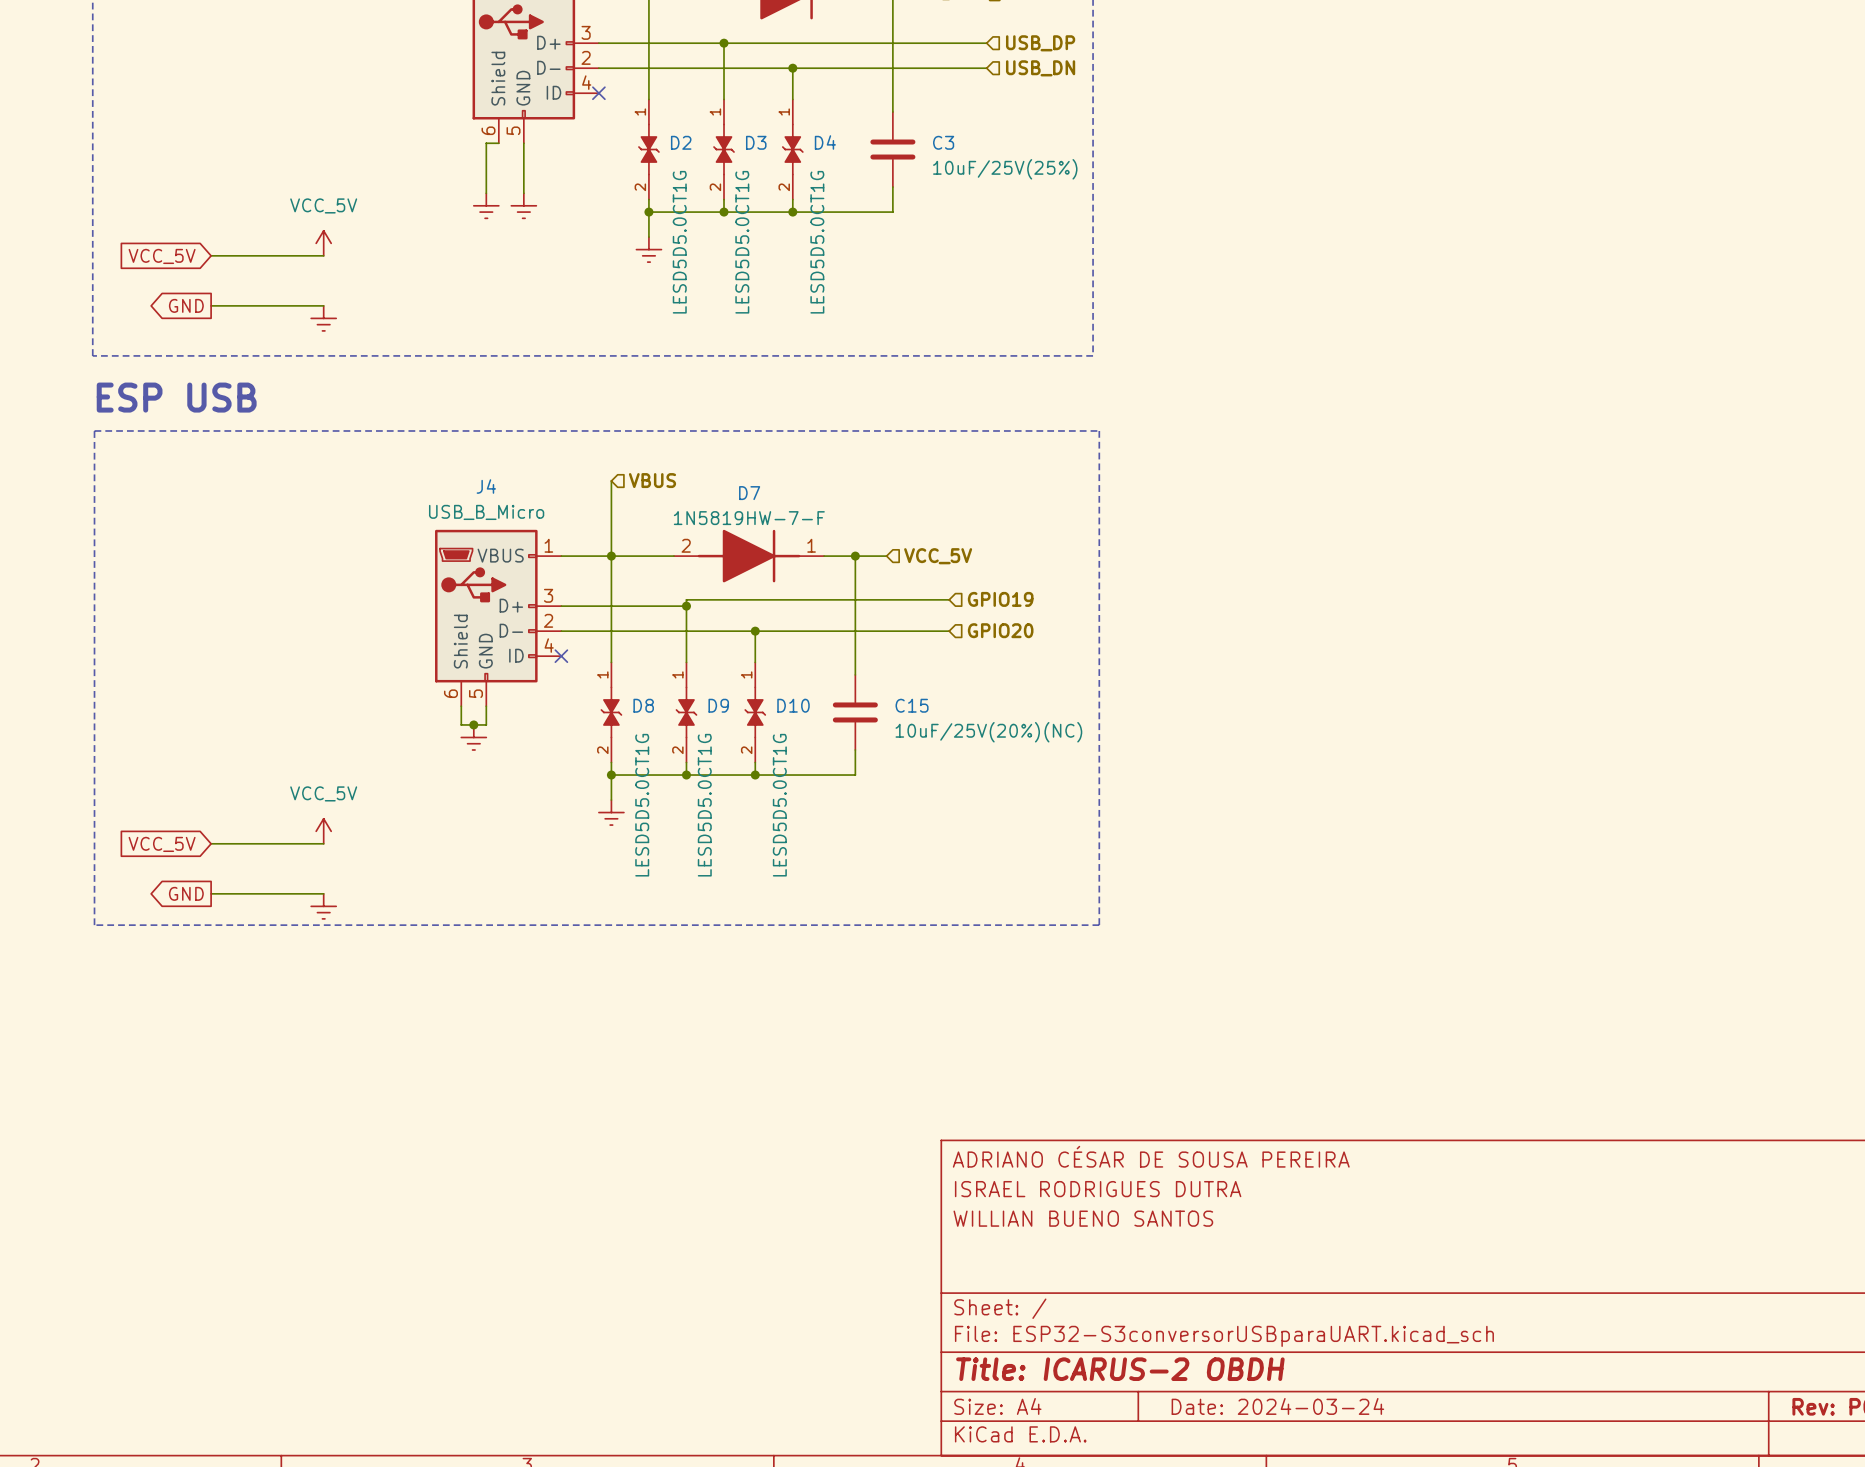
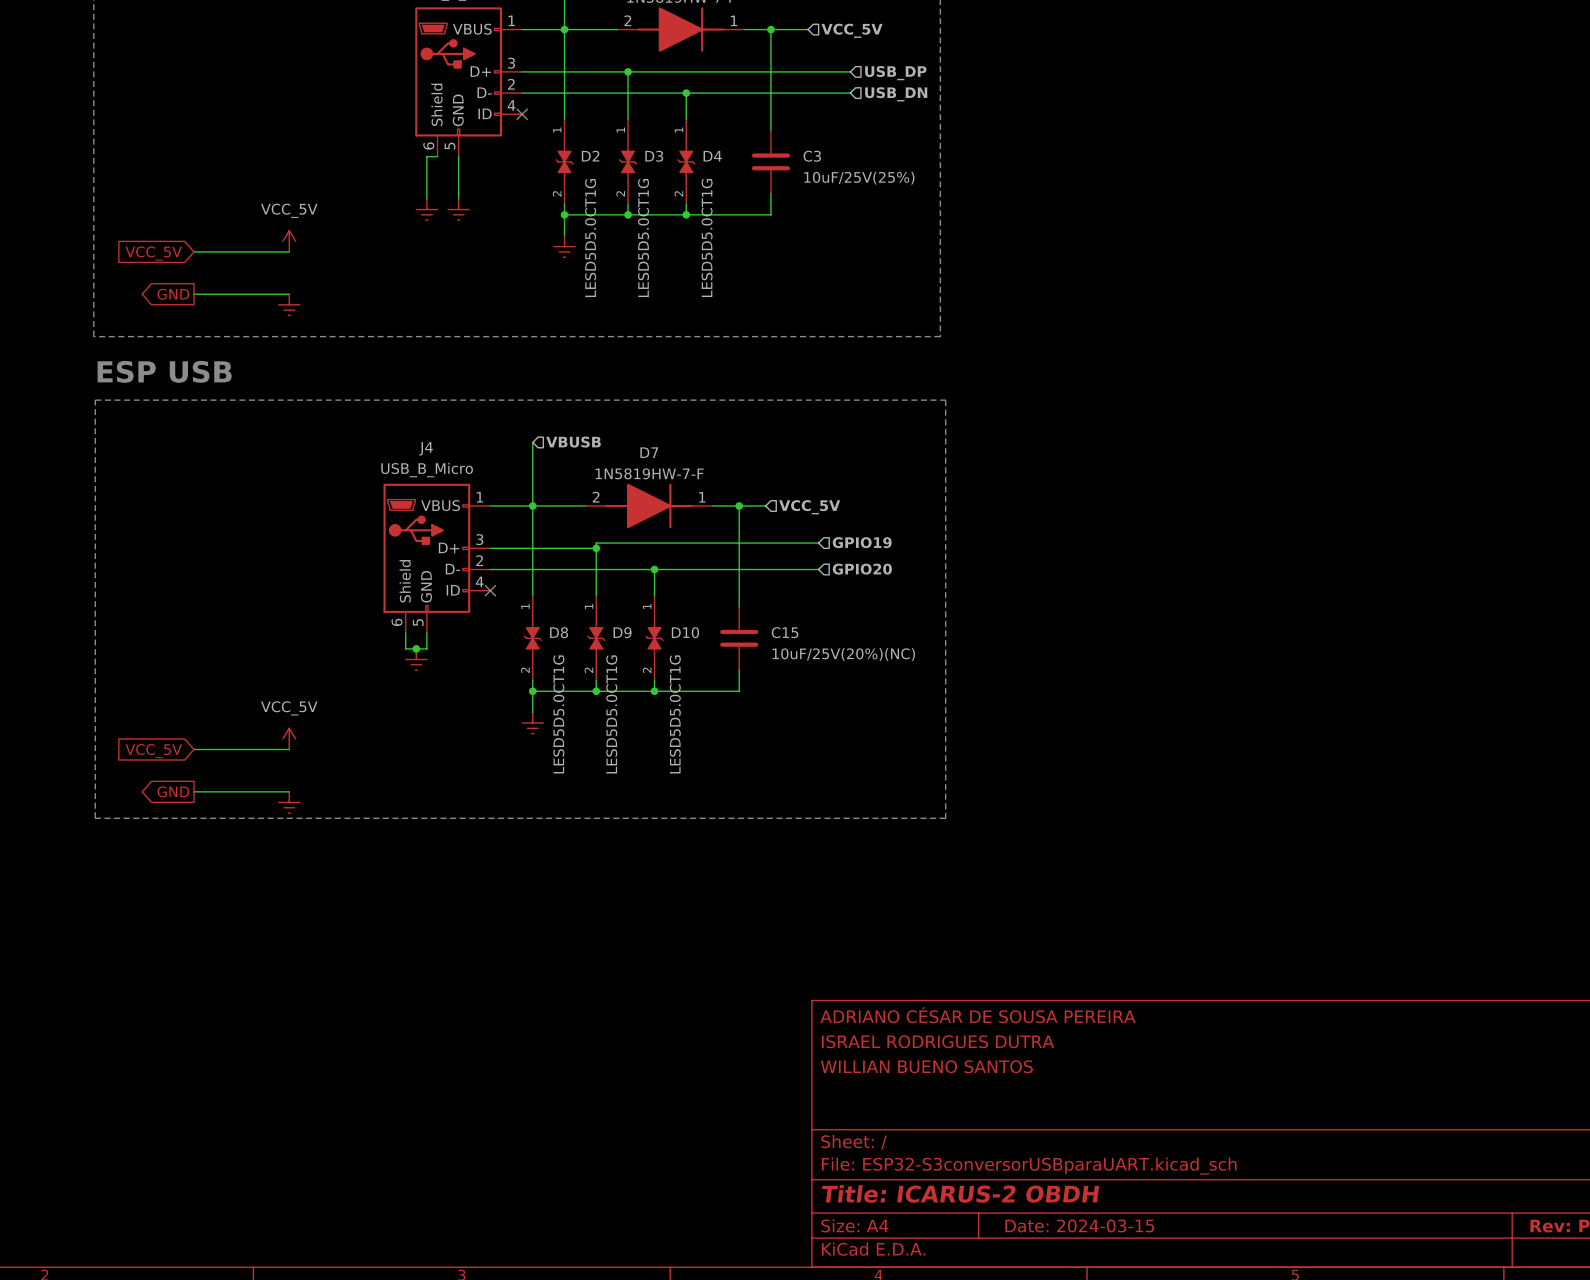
hierarchical label: VBUS (652, 480) -> VBUSB (573, 442)
title block: Date: 2024-03-24 (1277, 1406) -> Date: 2024-03-15 (1079, 1225)

